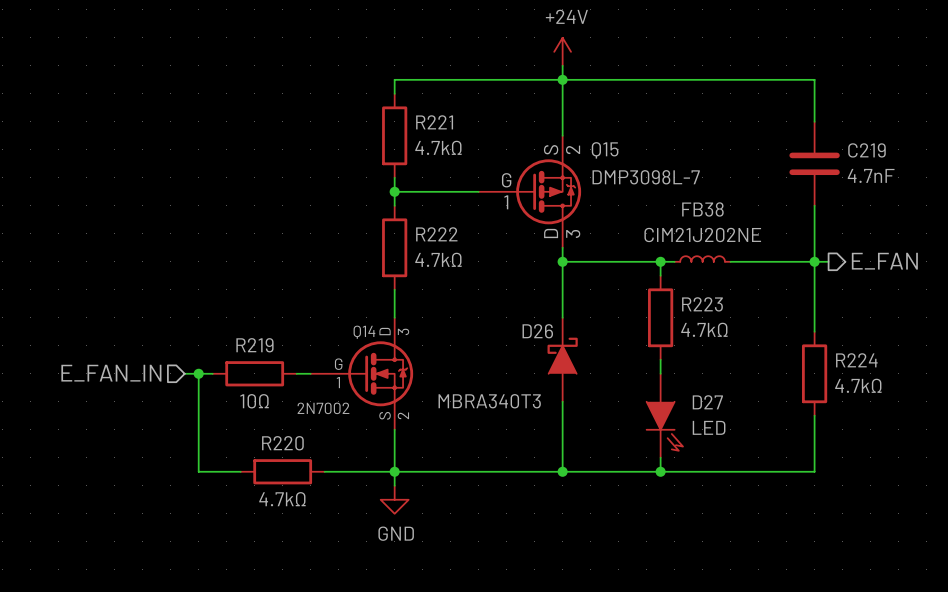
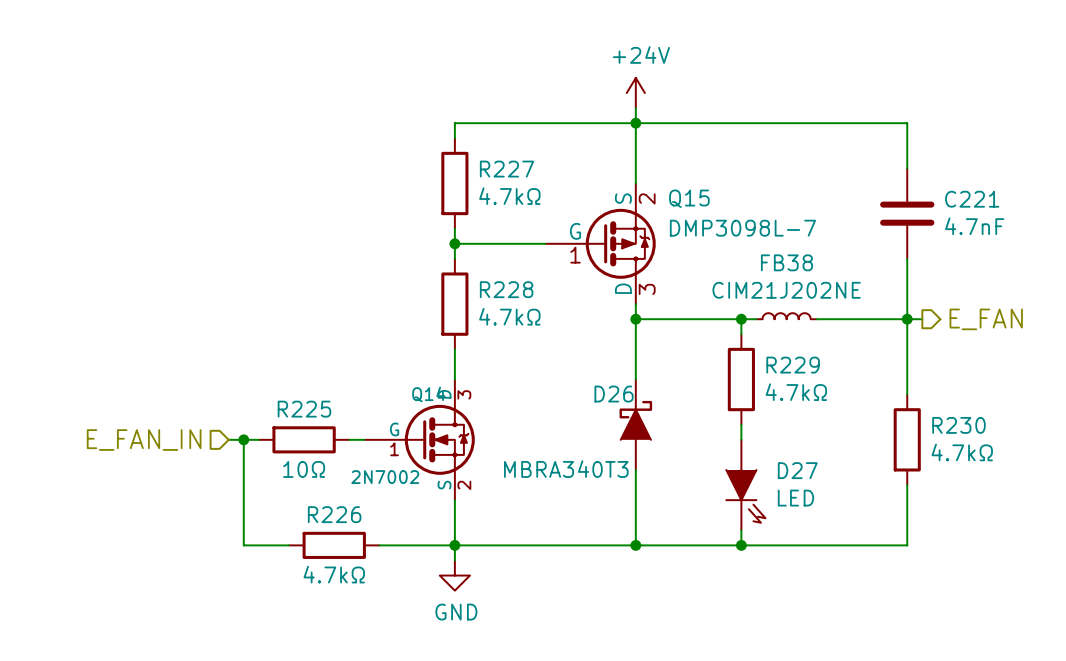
R221 name: R221 (434, 122) -> R227 (506, 169)
C219 name: C219 (866, 150) -> C221 (972, 199)
R222 name: R222 (436, 234) -> R228 (506, 289)
R223 name: R223 (702, 304) -> R229 (793, 365)
R219 name: R219 (254, 345) -> R225 (304, 409)
R224 name: R224 (856, 360) -> R230 (958, 425)
R220 name: R220 (282, 443) -> R226 (334, 514)

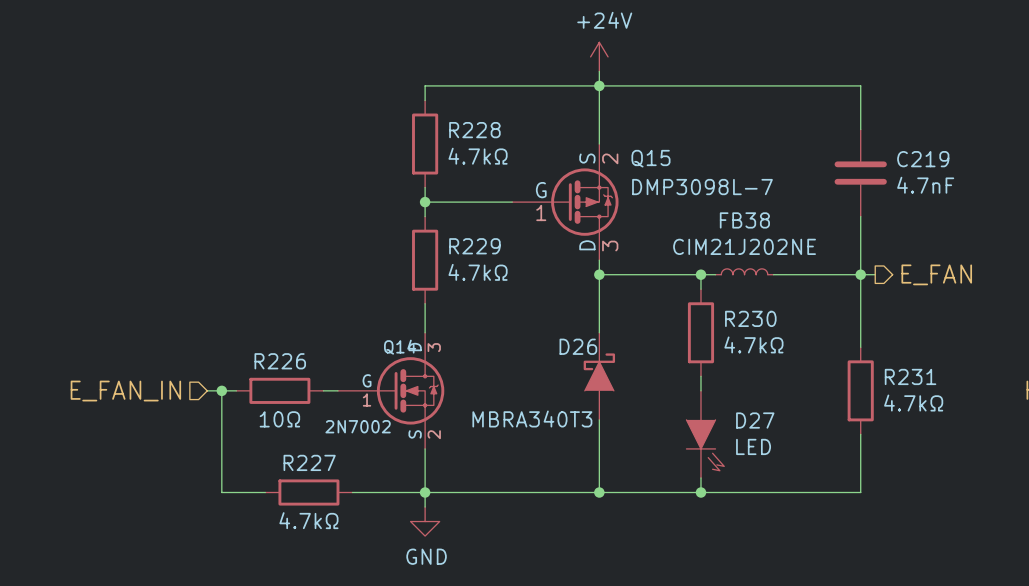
R227 name: R227 (506, 169) -> R228 (474, 130)
C221 name: C221 (972, 199) -> C219 (923, 159)
R228 name: R228 (506, 289) -> R229 (474, 246)
R229 name: R229 (793, 365) -> R230 (750, 318)
R225 name: R225 (304, 409) -> R226 (280, 361)
R230 name: R230 (958, 425) -> R231 (910, 376)
R226 name: R226 (334, 514) -> R227 (309, 462)

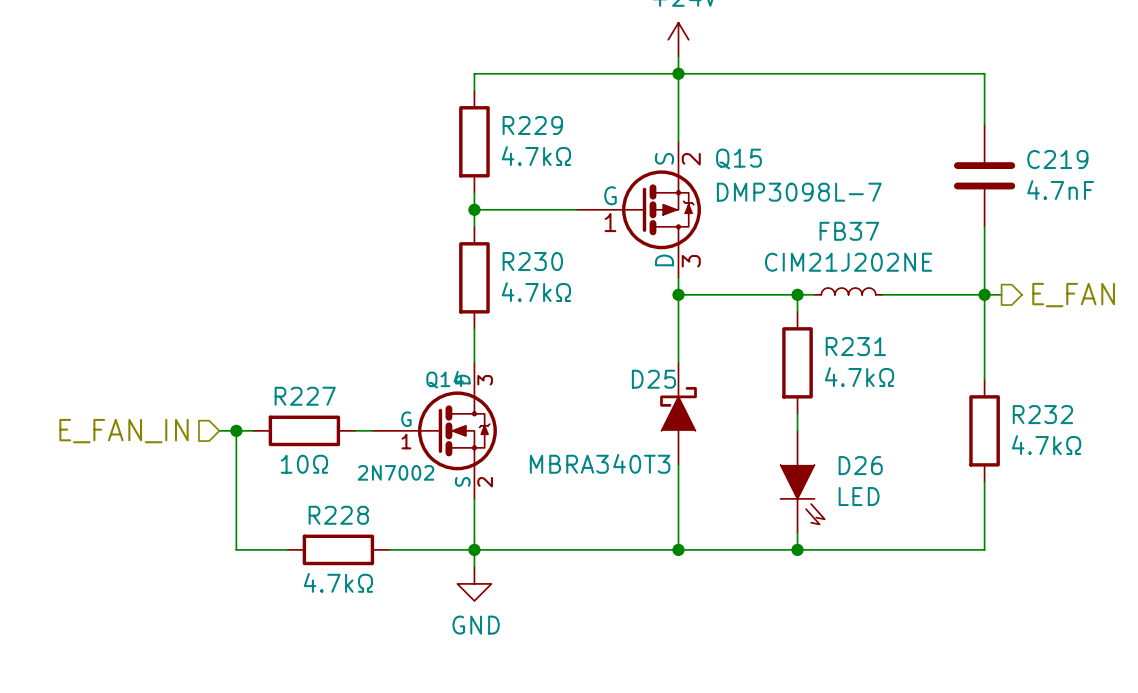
R228 name: R228 (474, 130) -> R229 (532, 125)
FB38 name: FB38 (744, 220) -> FB37 (849, 231)
R229 name: R229 (474, 246) -> R230 (532, 261)
R230 name: R230 (750, 318) -> R231 (855, 346)
D26 name: D26 (578, 346) -> D25 (653, 379)
R226 name: R226 (280, 361) -> R227 (305, 396)
R231 name: R231 (910, 376) -> R232 (1042, 414)
D27 name: D27 (755, 420) -> D26 (860, 465)
R227 name: R227 (309, 462) -> R228 (338, 515)

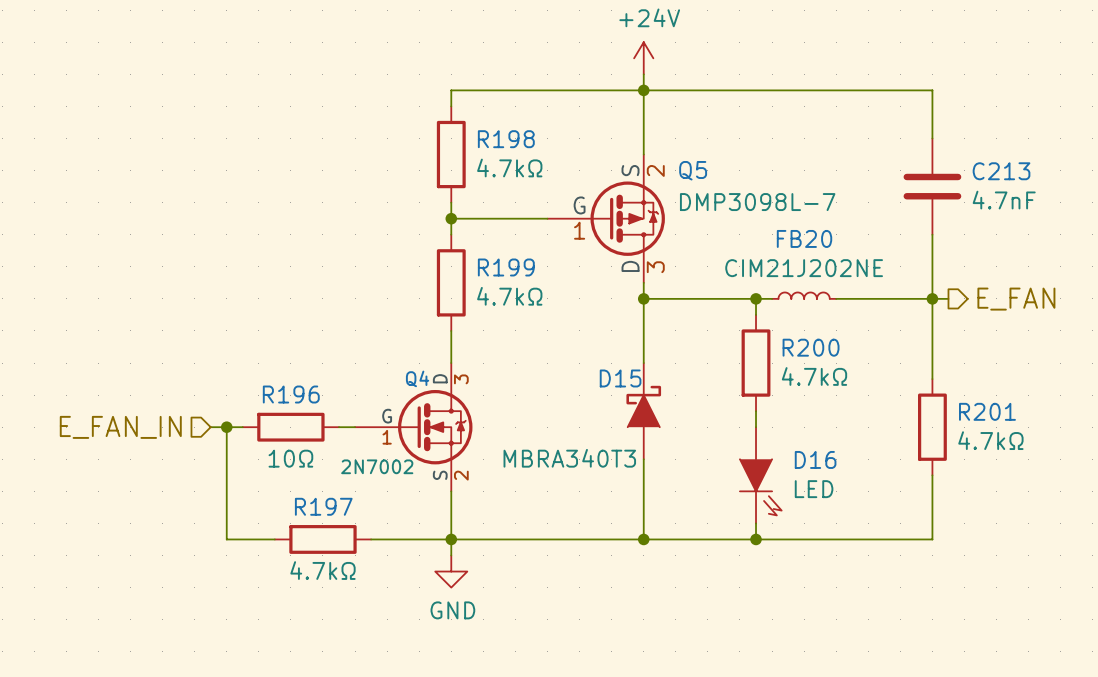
R229 name: R229 (532, 125) -> R198 (506, 139)
Q15 name: Q15 (738, 158) -> Q5 (693, 170)
C219 name: C219 (1057, 159) -> C213 (1001, 171)
FB37 name: FB37 (849, 231) -> FB20 (804, 238)
R230 name: R230 (532, 261) -> R199 (506, 267)
R231 name: R231 (855, 346) -> R200 (811, 347)
Q14 name: Q14 (445, 379) -> Q4 (417, 378)
D25 name: D25 (653, 379) -> D15 (620, 378)
R227 name: R227 (305, 396) -> R196 (291, 394)
R232 name: R232 (1042, 414) -> R201 (987, 411)
D26 name: D26 (860, 465) -> D16 (815, 459)
R228 name: R228 (338, 515) -> R197 (323, 506)

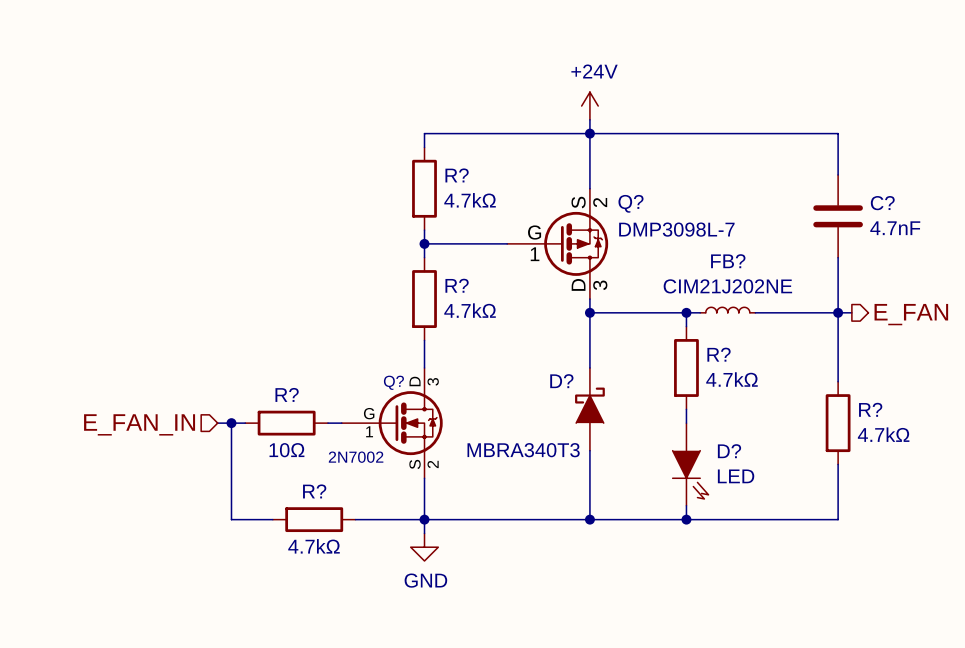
R198 name: R198 (506, 139) -> R? (457, 175)
Q5 name: Q5 (693, 170) -> Q? (630, 203)
C213 name: C213 (1001, 171) -> C? (882, 203)
FB20 name: FB20 (804, 238) -> FB? (728, 261)
R199 name: R199 (506, 267) -> R? (457, 285)
R200 name: R200 (811, 347) -> R? (719, 354)
Q4 name: Q4 (417, 378) -> Q? (393, 382)
D15 name: D15 (620, 378) -> D? (561, 381)
R196 name: R196 (291, 394) -> R? (287, 394)
R201 name: R201 (987, 411) -> R? (870, 409)
D16 name: D16 (815, 459) -> D? (729, 451)
R197 name: R197 (323, 506) -> R? (314, 491)

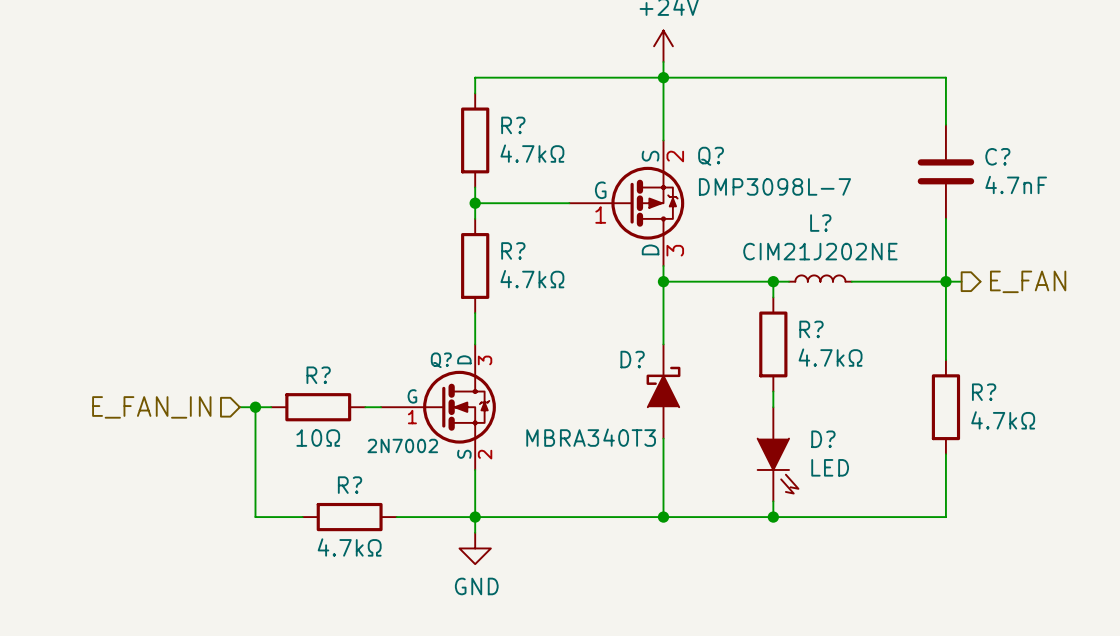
FB? name: FB? (728, 261) -> L? (820, 223)

